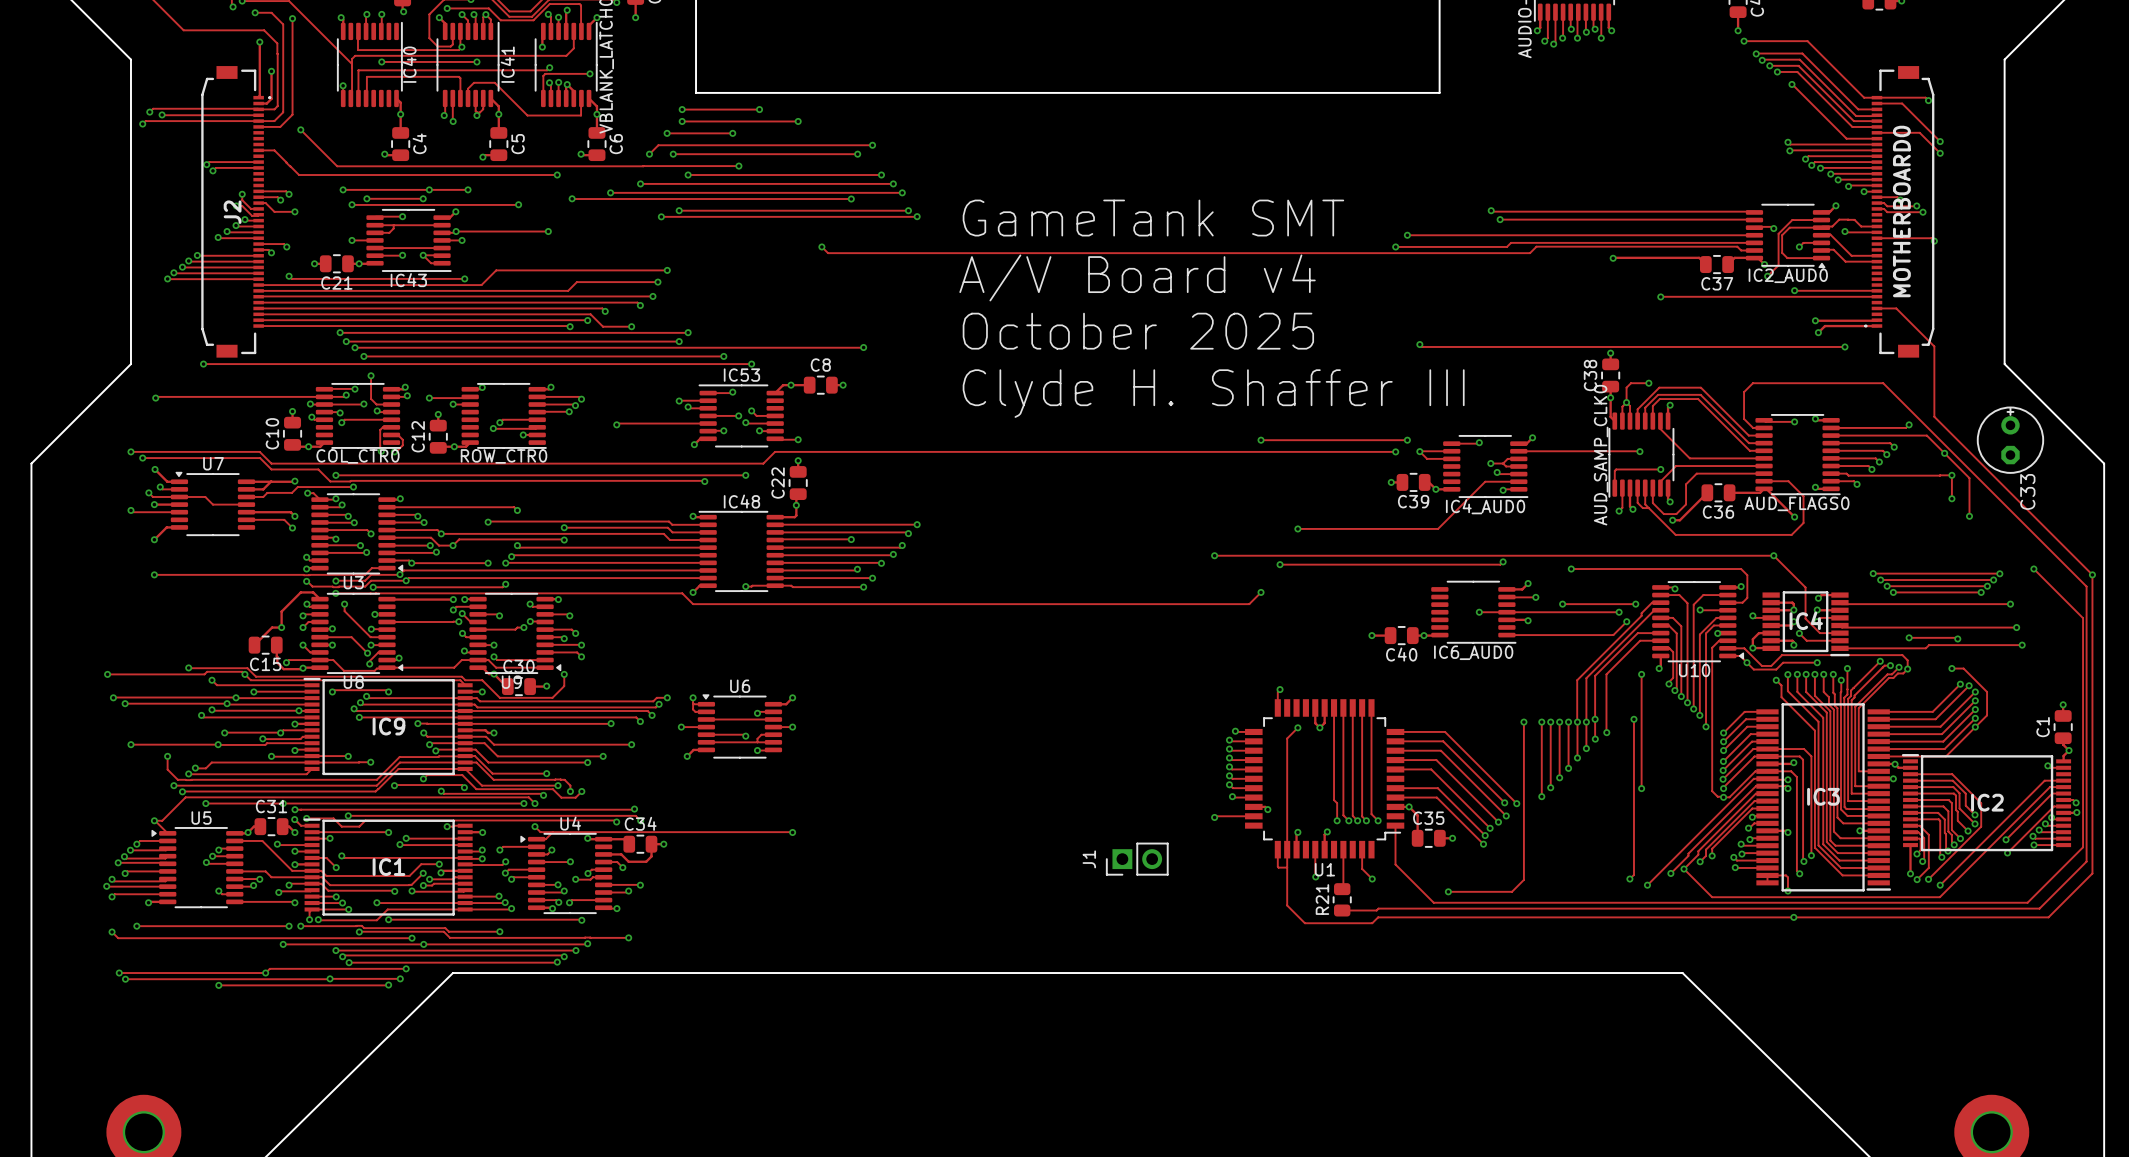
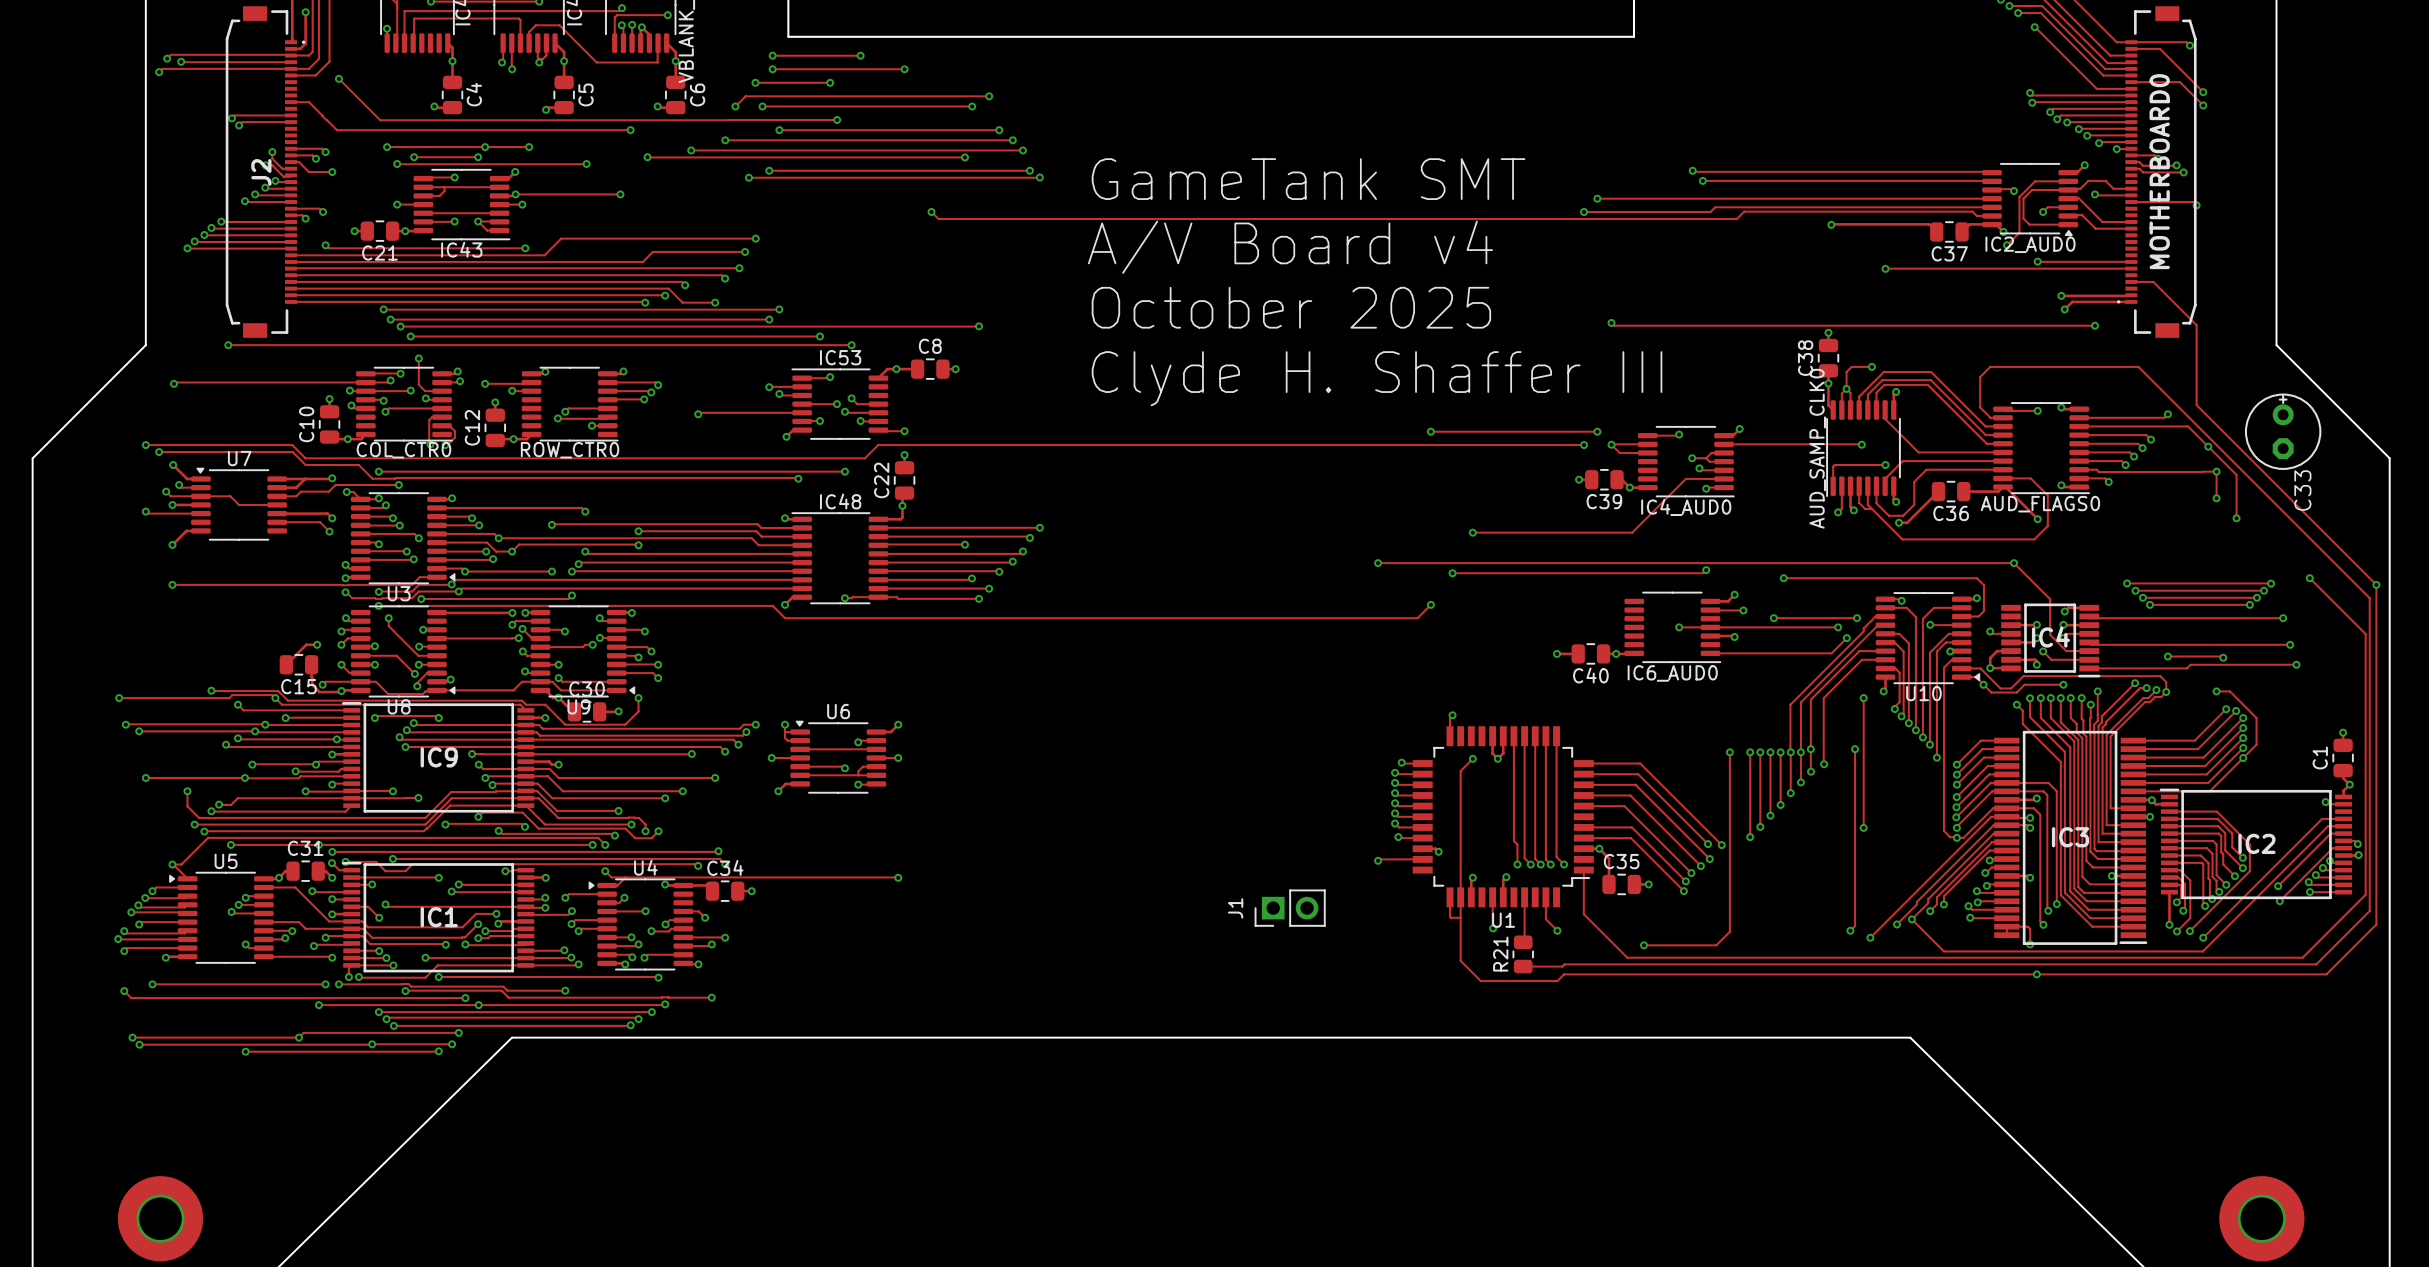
track: (319, 599) (313, 592) (300, 592) (281, 611) (281, 627) -> none
track: (1771, 602) (1792, 602) (1793, 609) -> none
track: (651, 844) (651, 856) (646, 861) (628, 861) (621, 854) (603, 854) -> none

